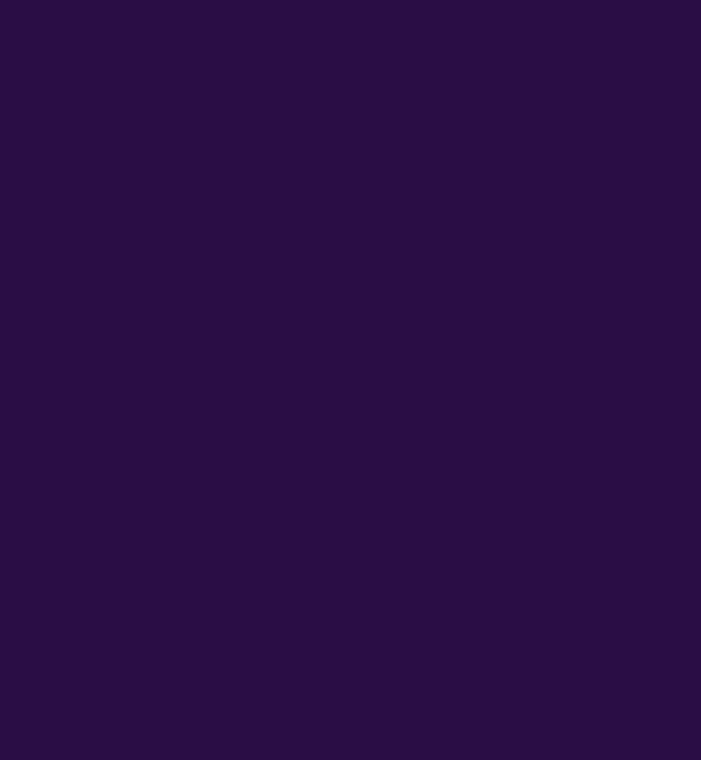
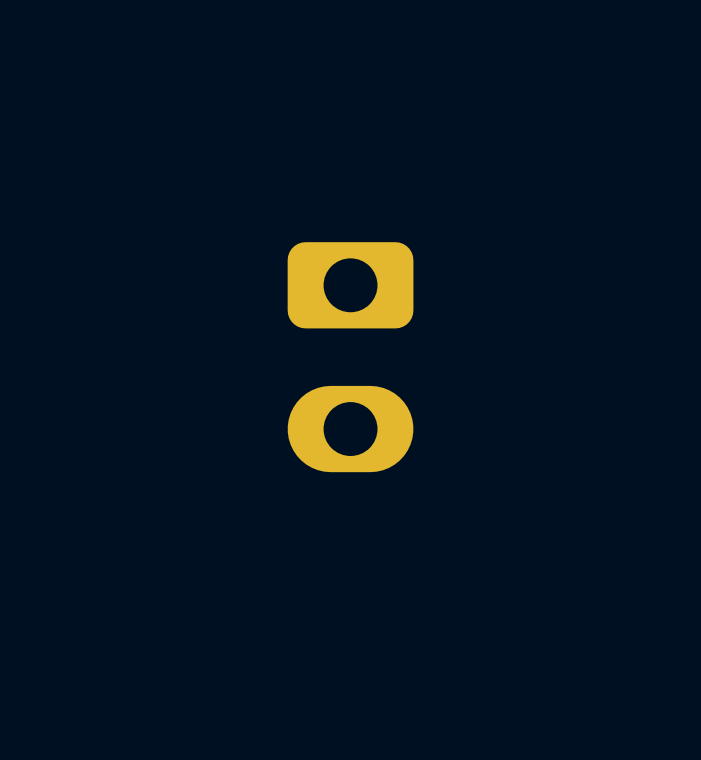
part: none -> (350, 357)

